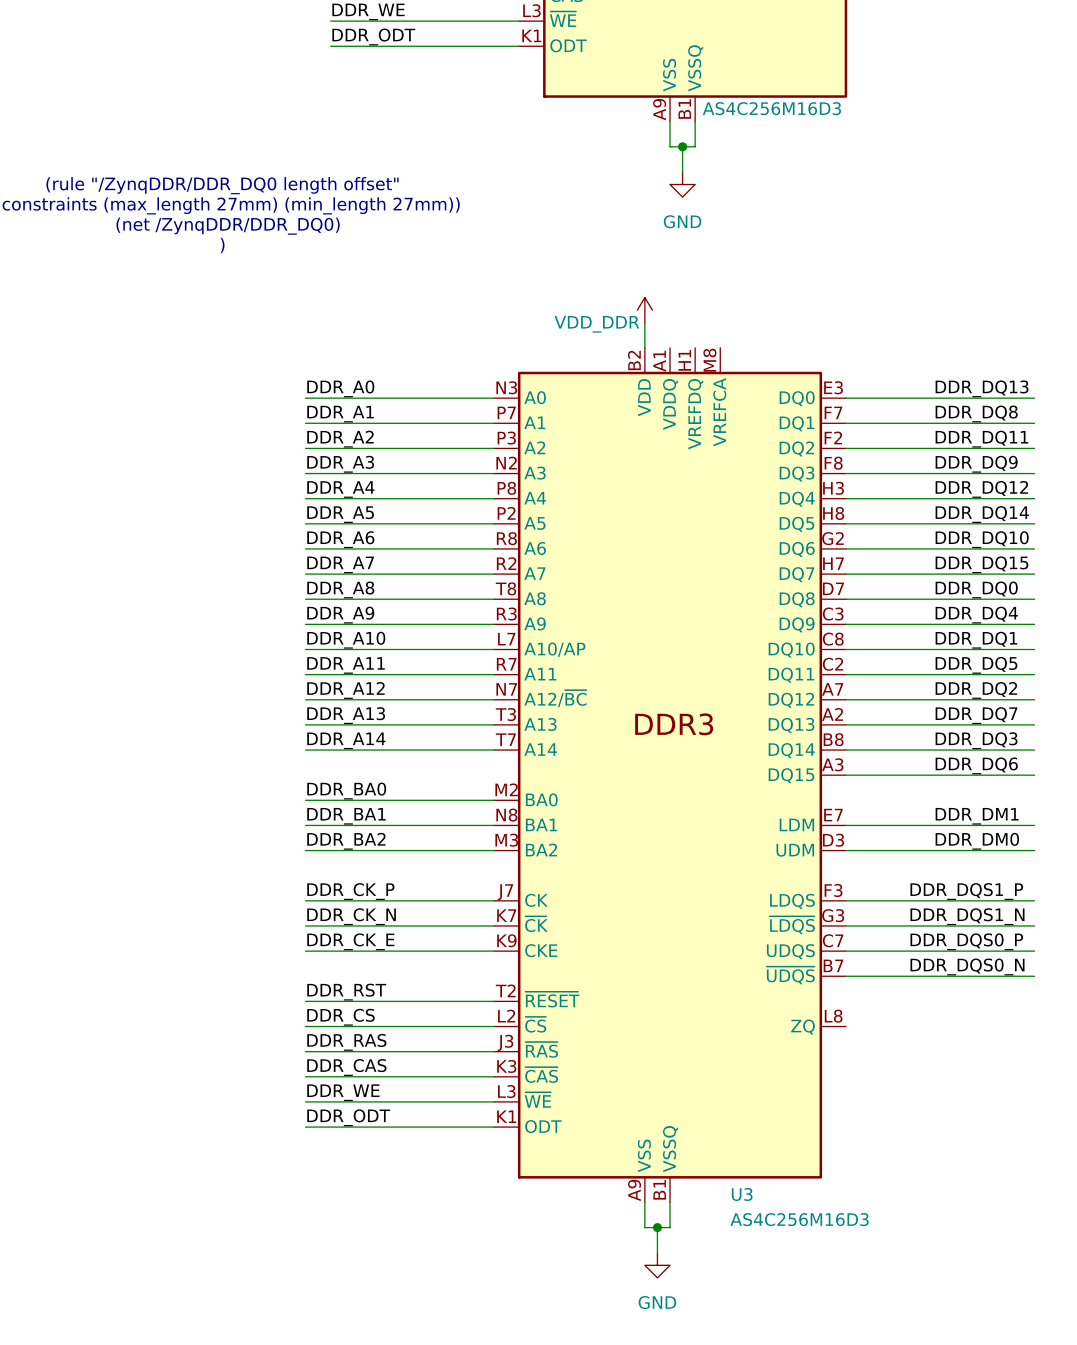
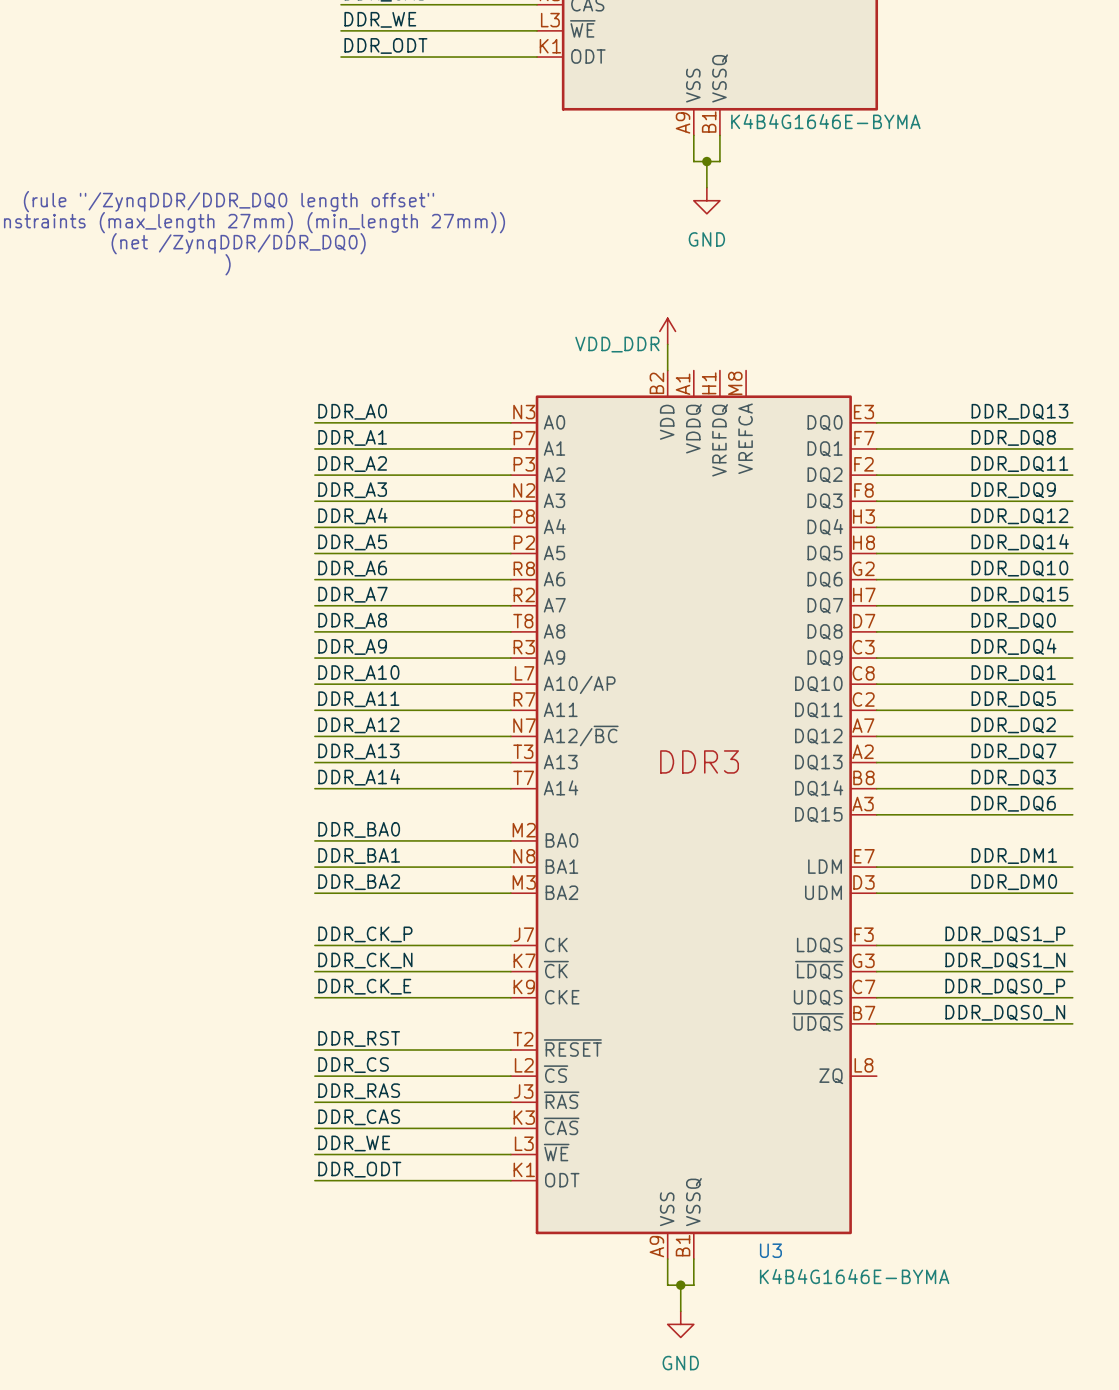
part value: AS4C256M16D3 (771, 108) -> K4B4G1646E-BYMA (825, 121)
U3 value: AS4C256M16D3 (799, 1219) -> K4B4G1646E-BYMA (854, 1276)

